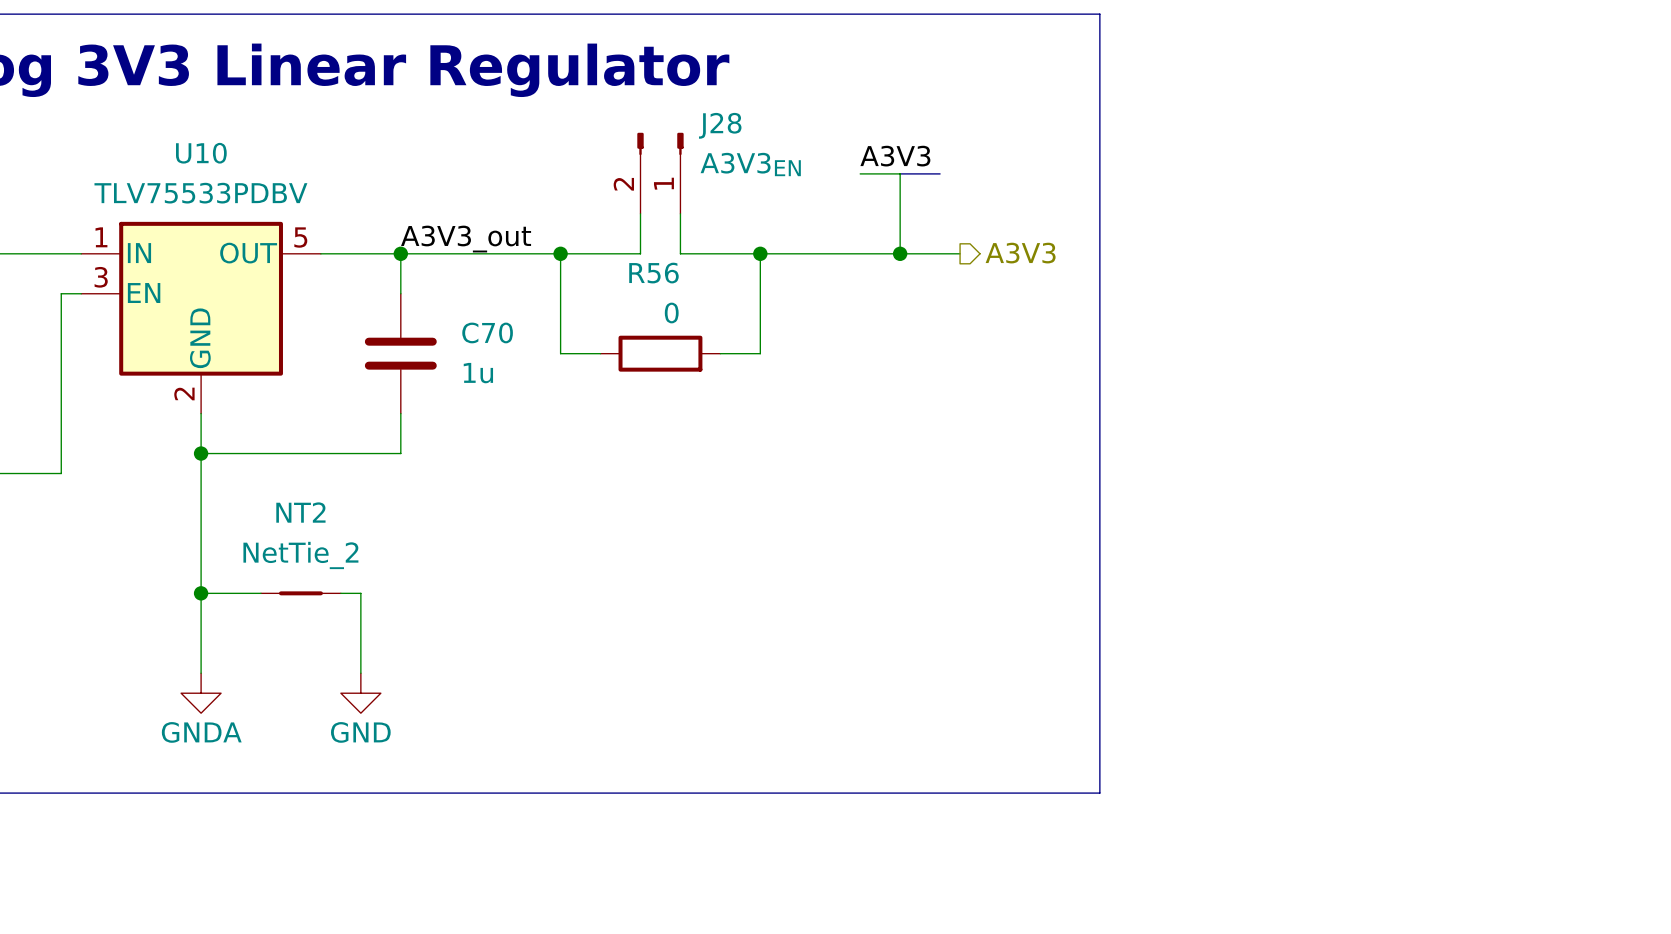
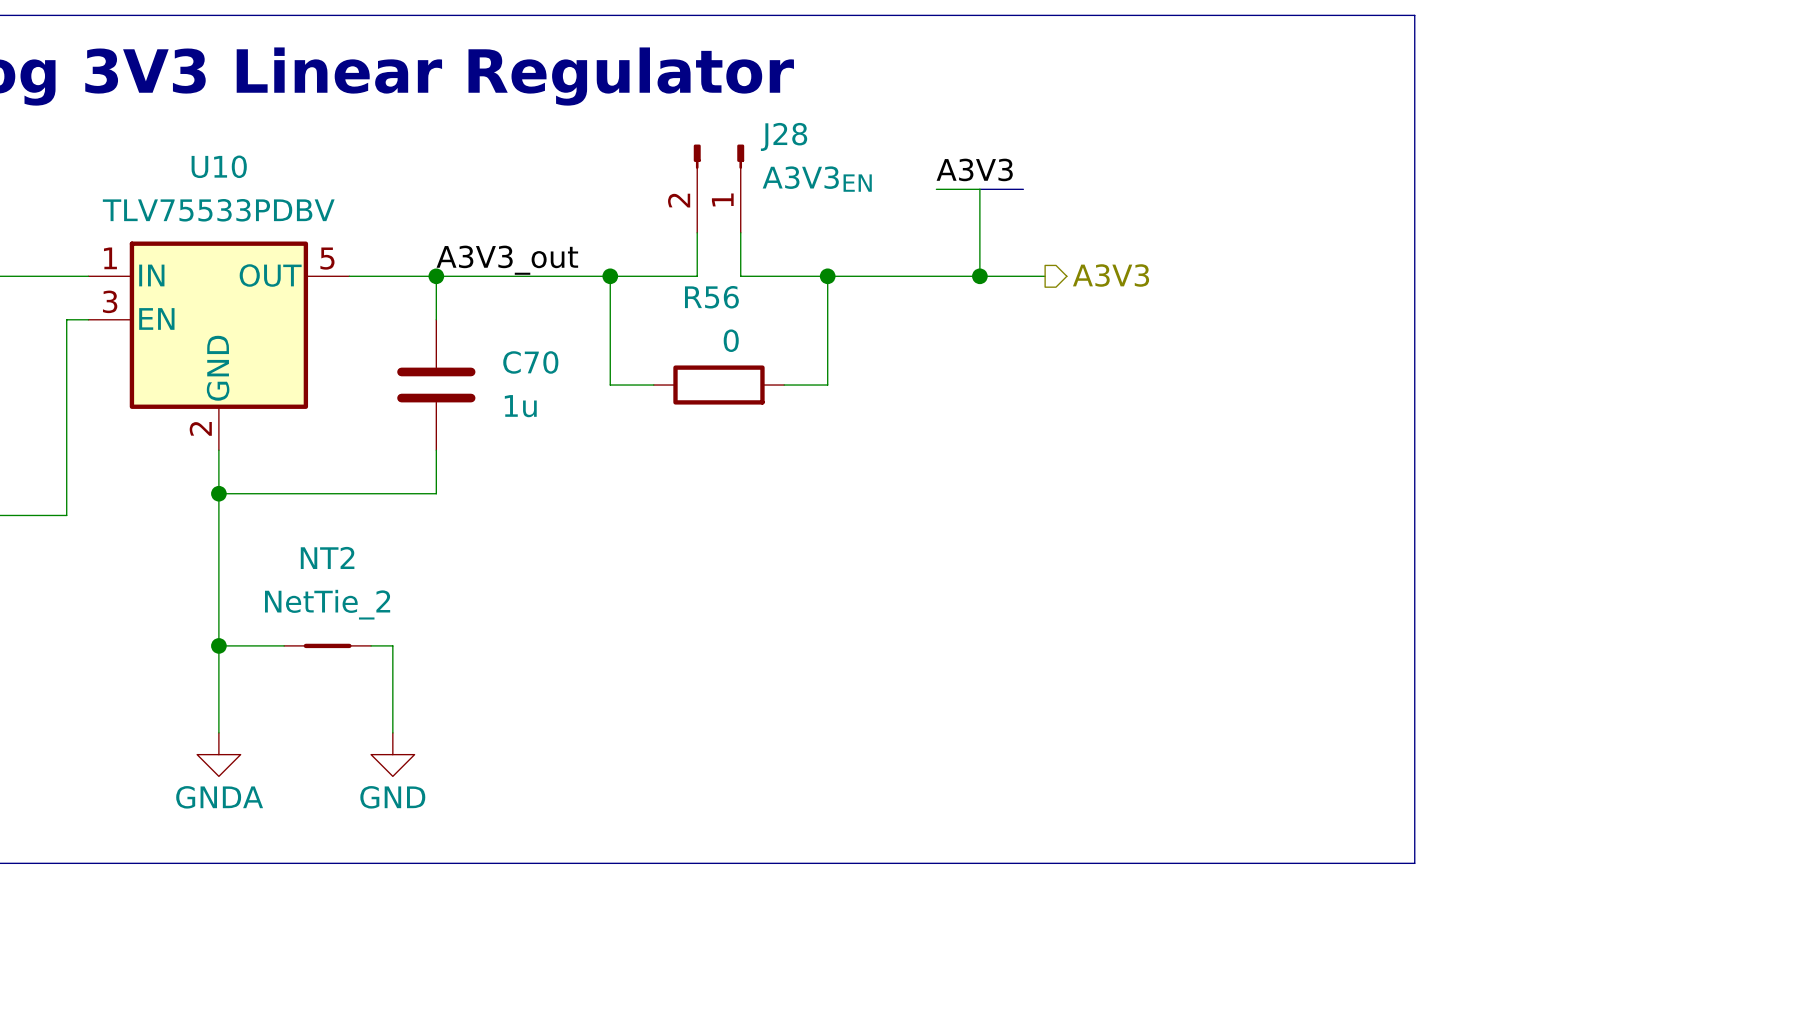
line: (1099, 14) (1099, 793) -> (1197, 15) (1414, 15) (1414, 863) (1197, 863)

